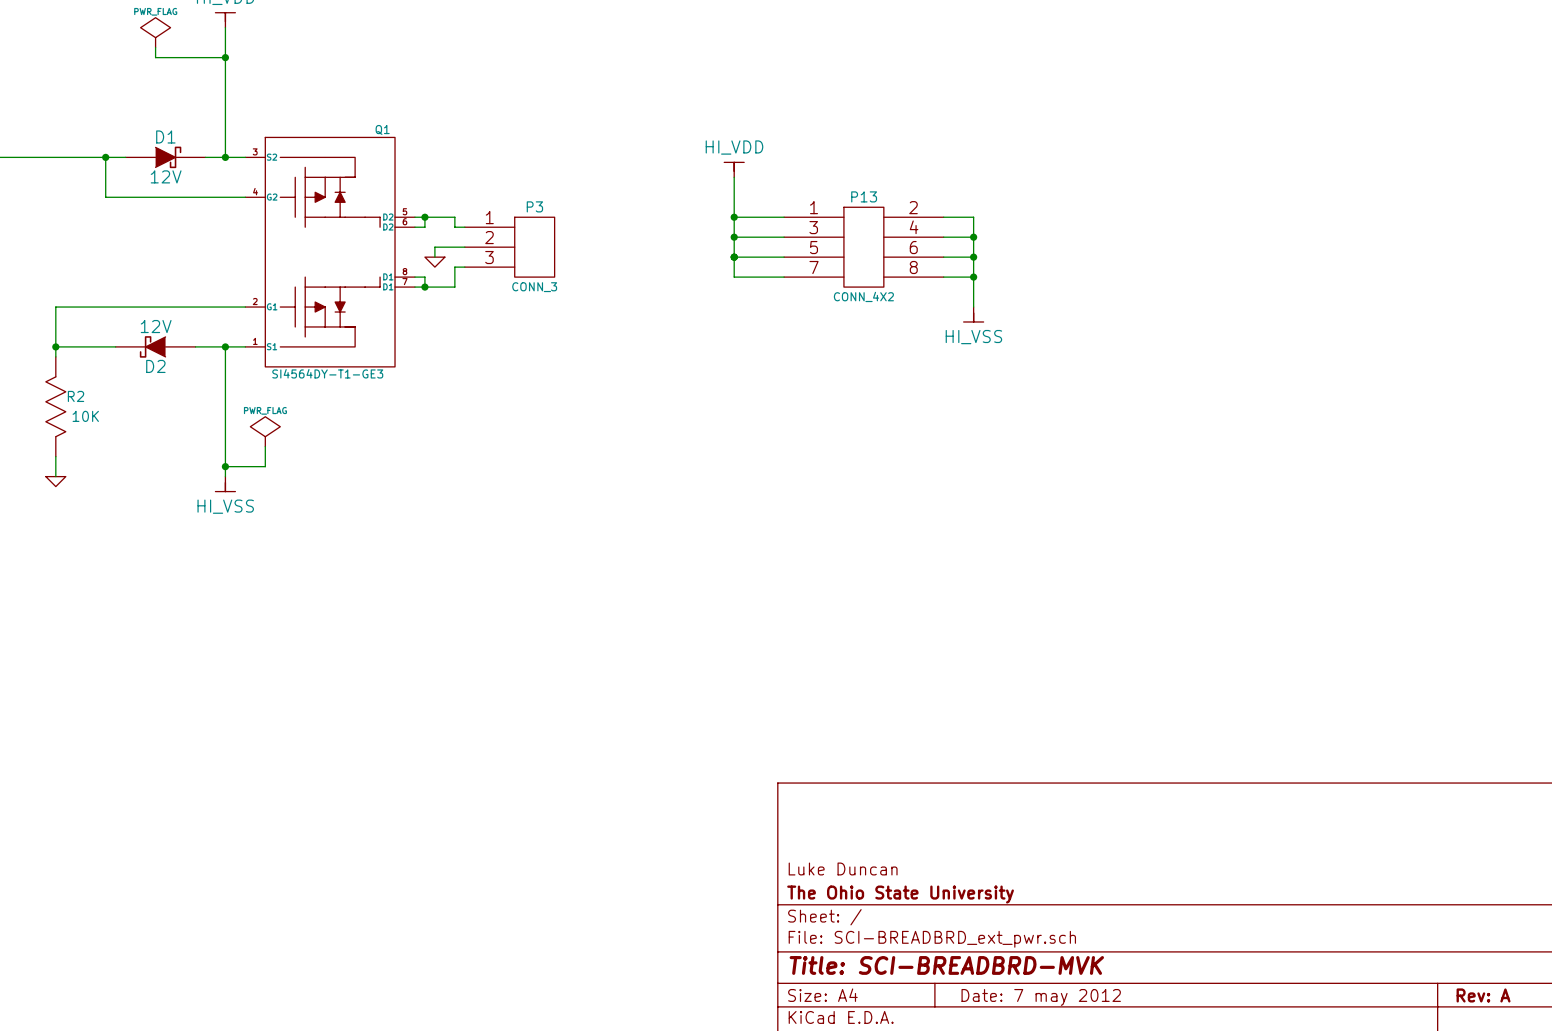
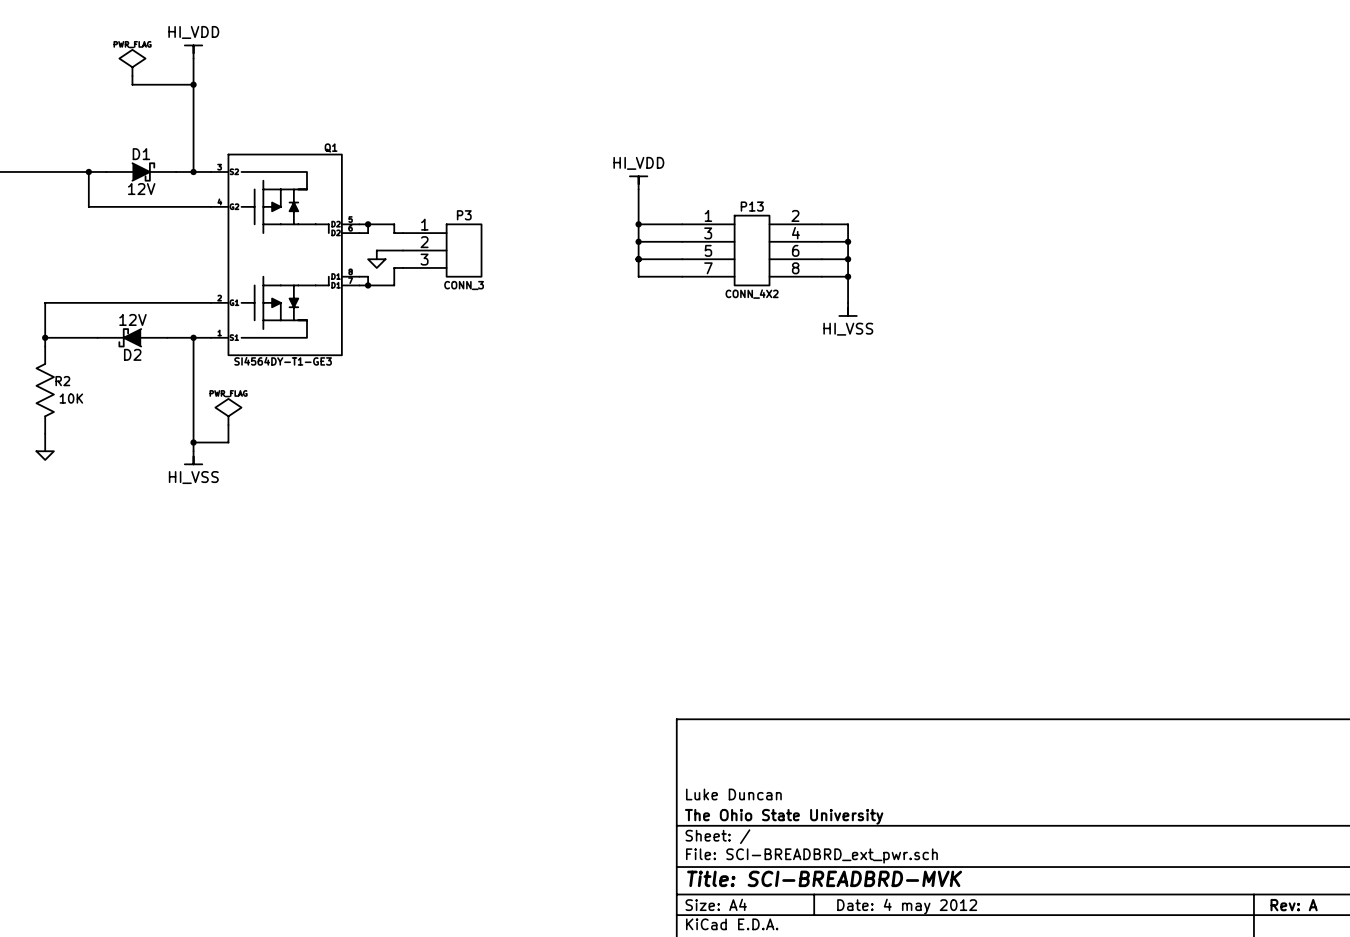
title block: Date: 7 may 2012 (1041, 997) -> Date: 4 may 2012 (907, 906)

